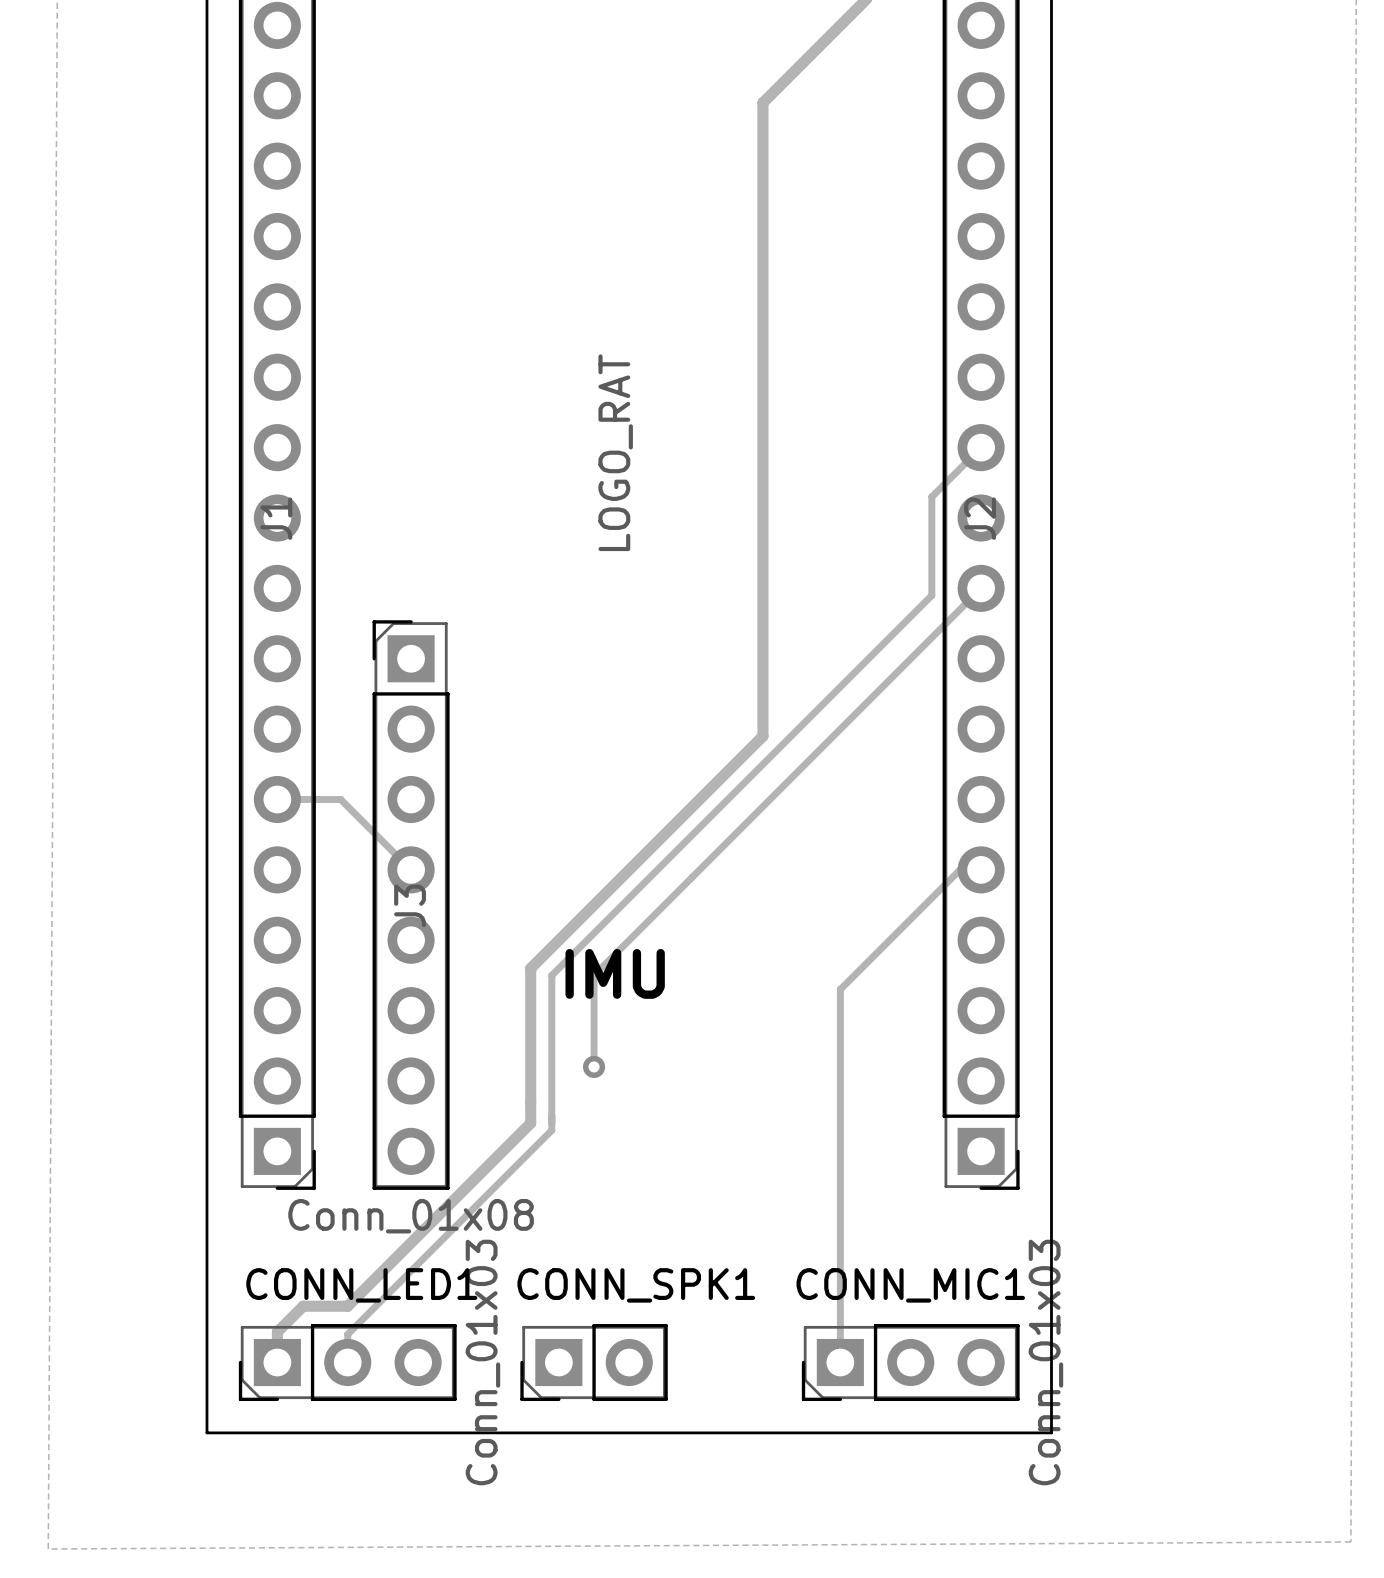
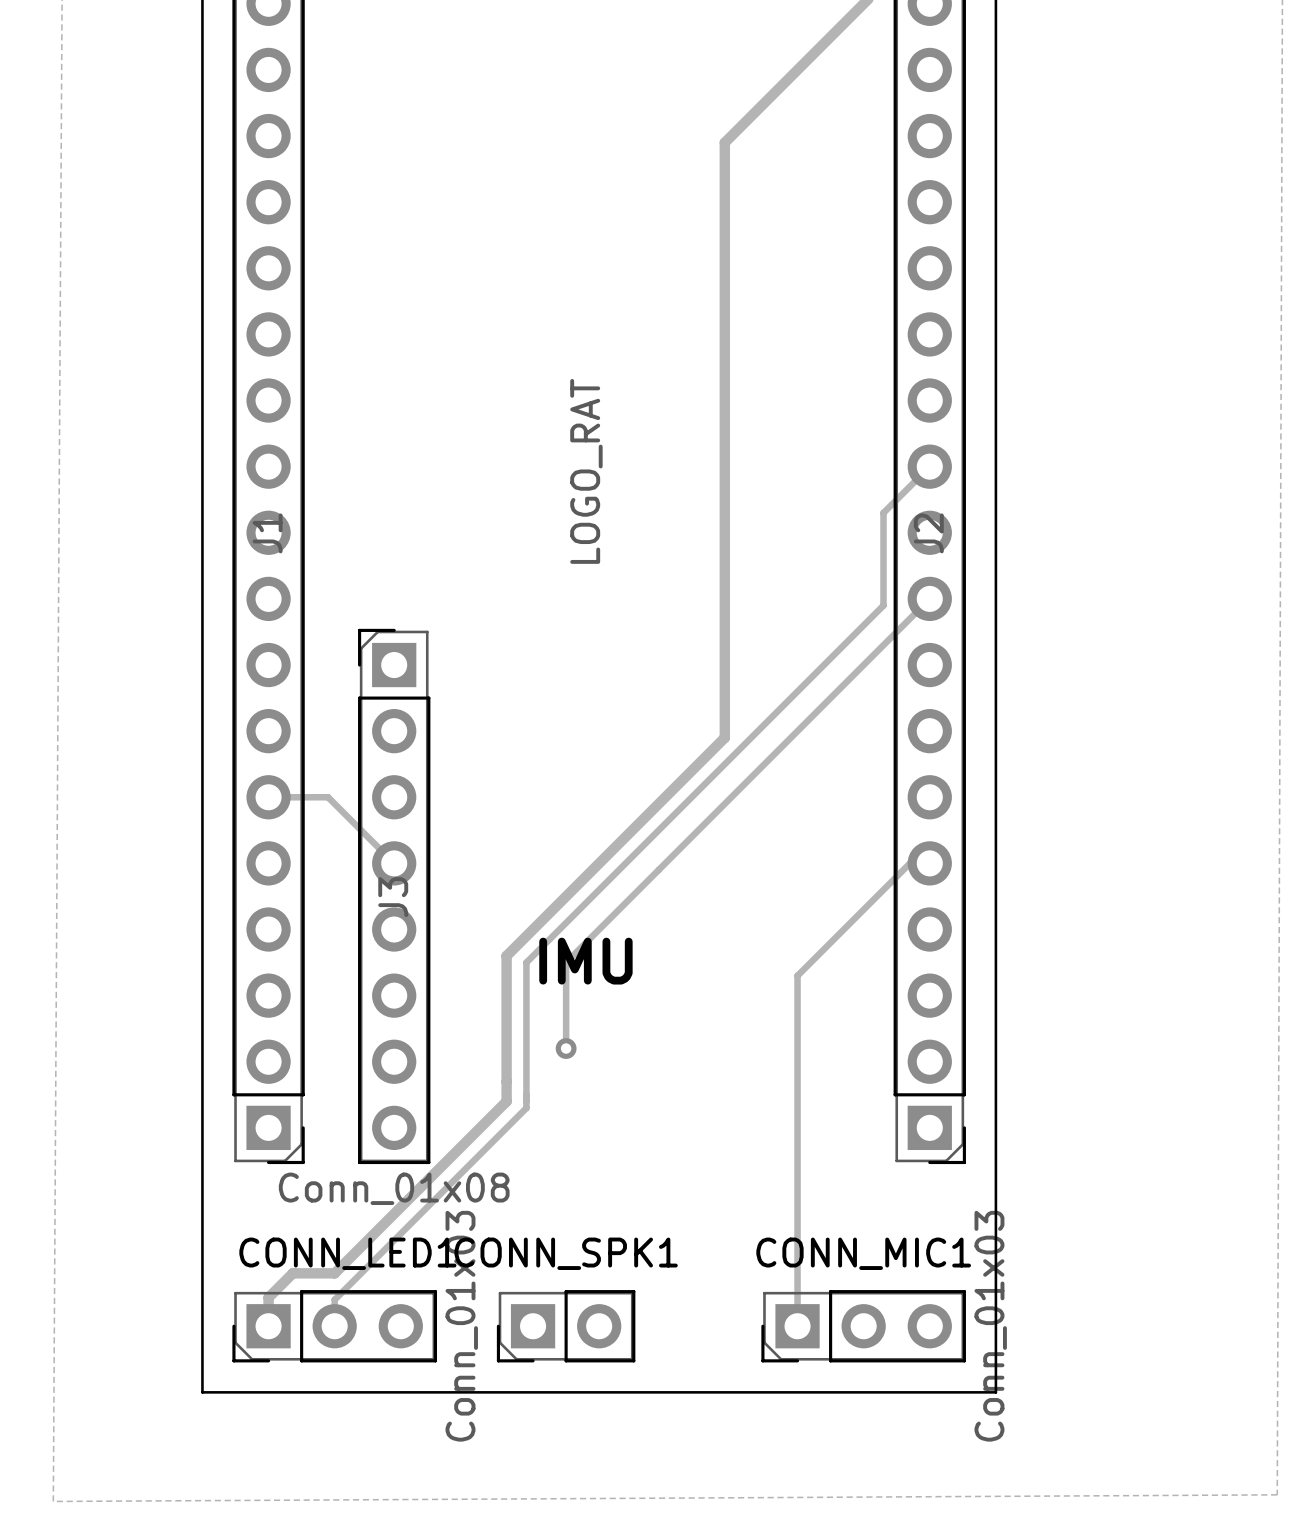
CONN_SPK1 name position: CONN_SPK1 (636, 1285) -> CONN_SPK1 (566, 1253)

